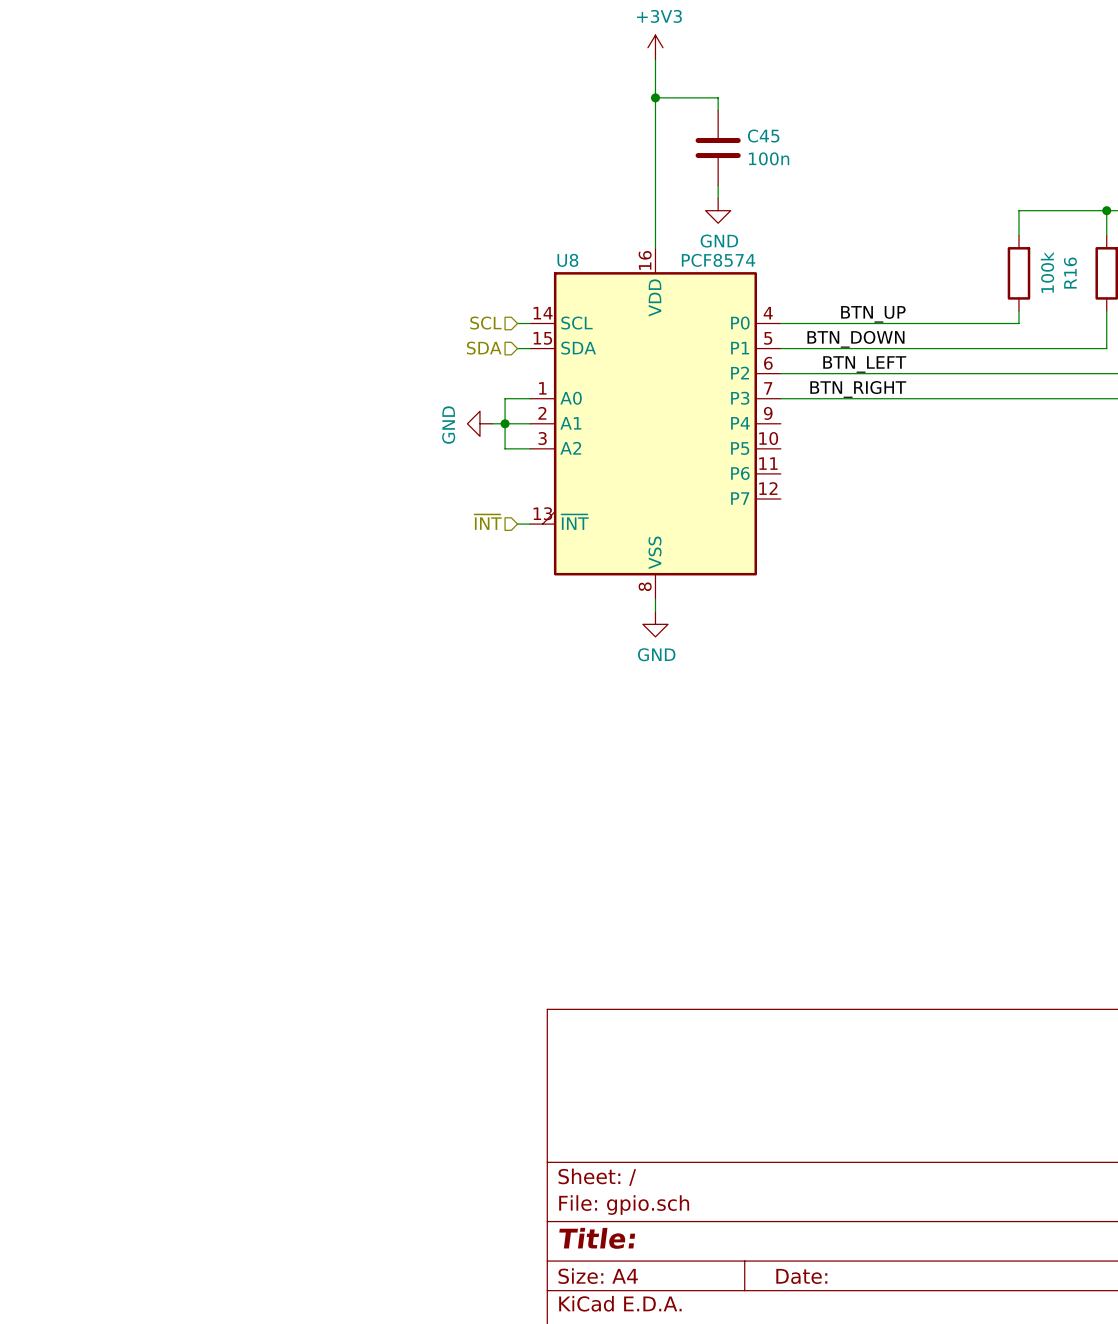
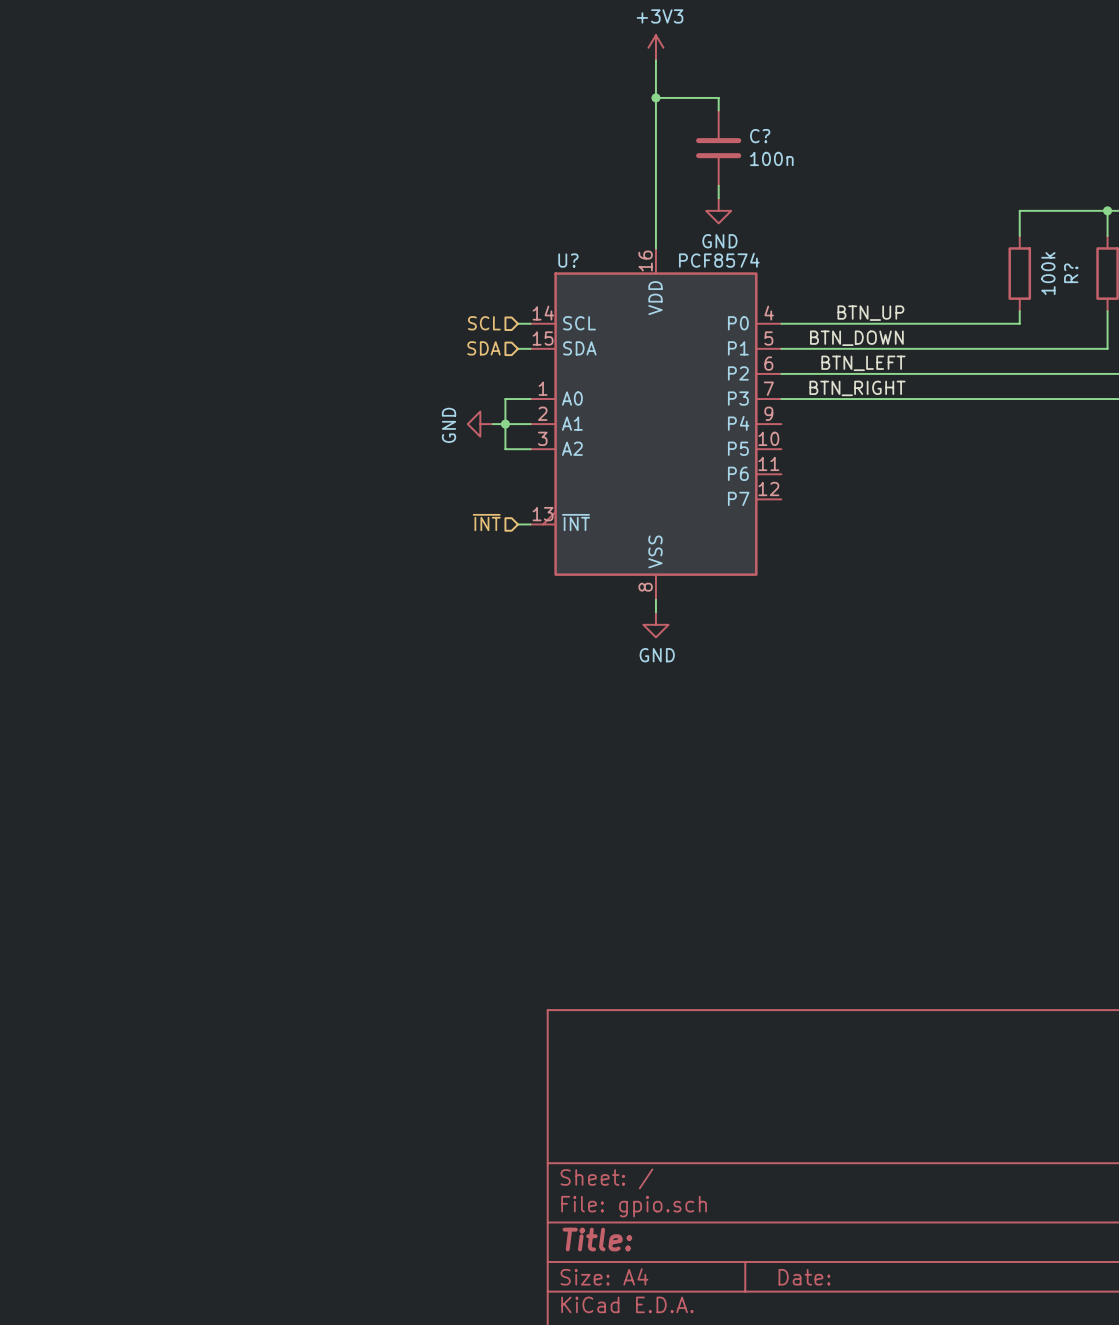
C45 name: C45 (763, 136) -> C? (760, 136)
U8 name: U8 (567, 260) -> U? (568, 260)
R16 name: R16 (1070, 273) -> R? (1071, 273)

